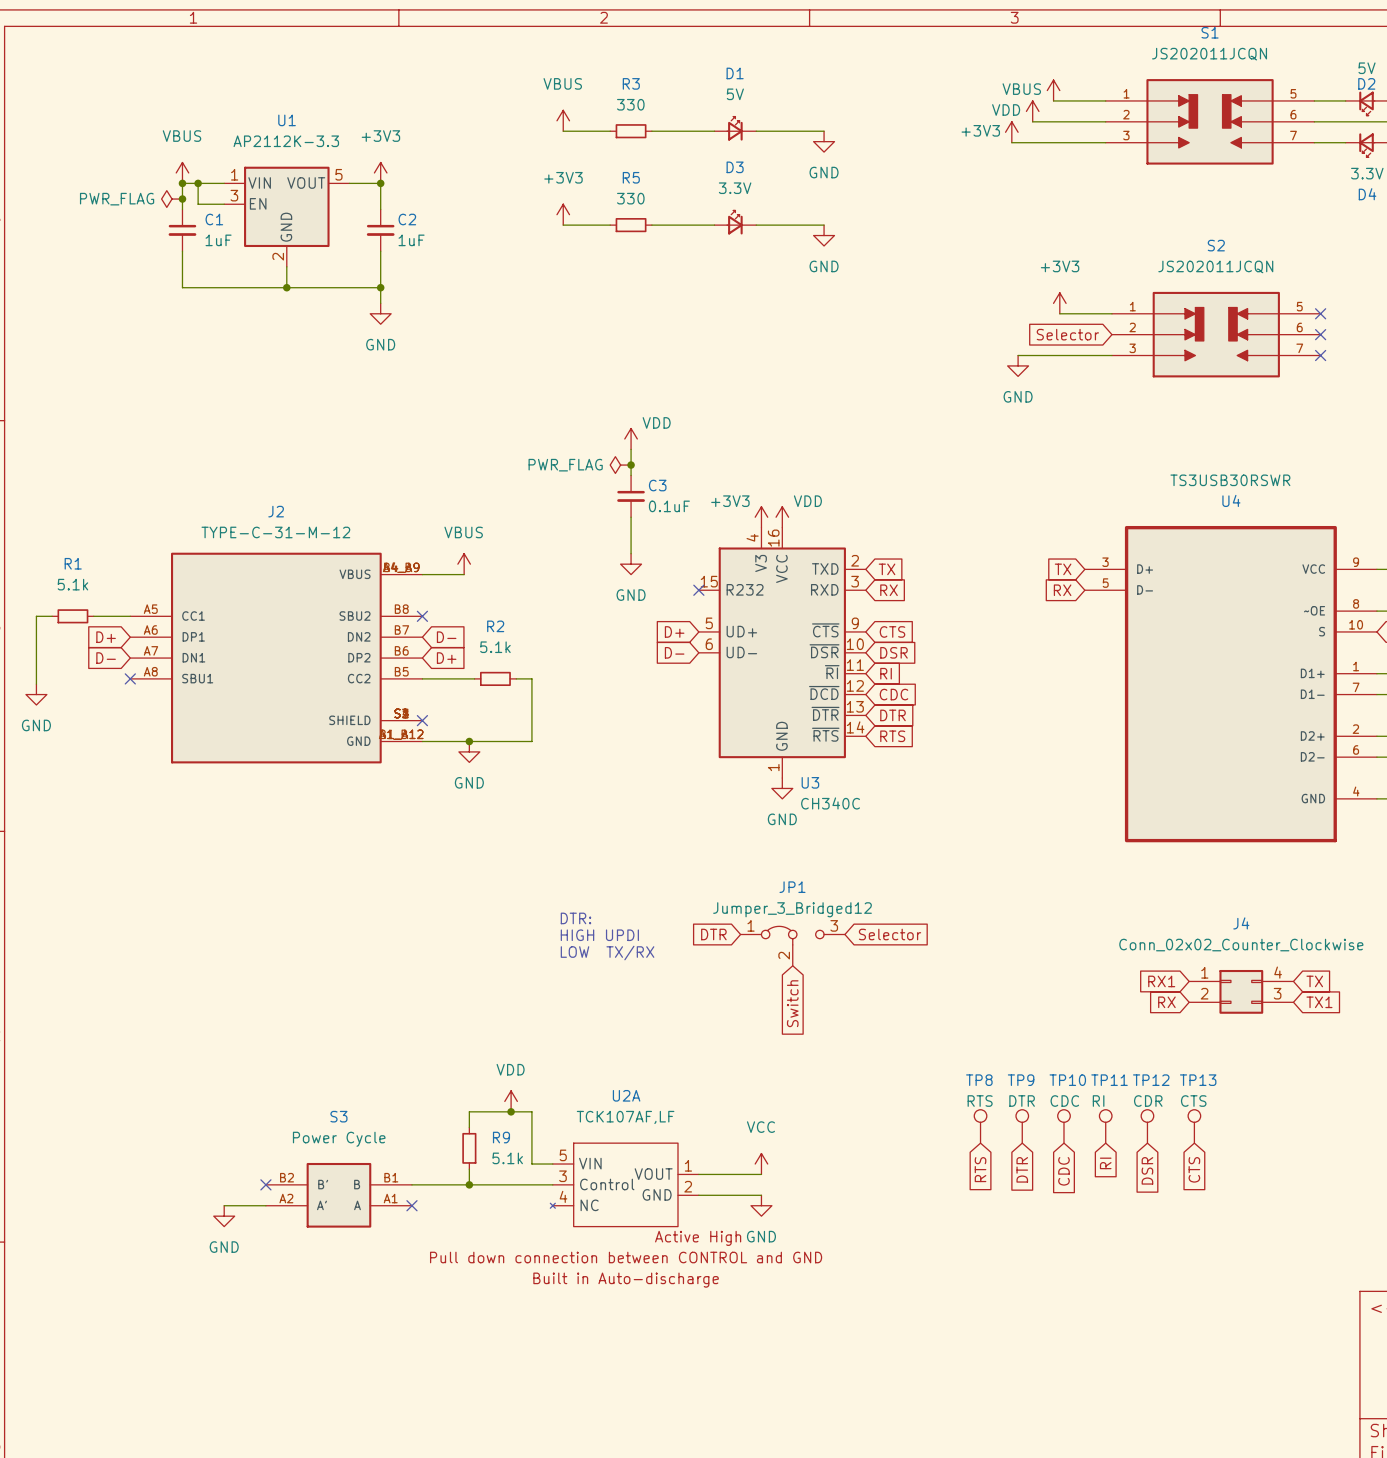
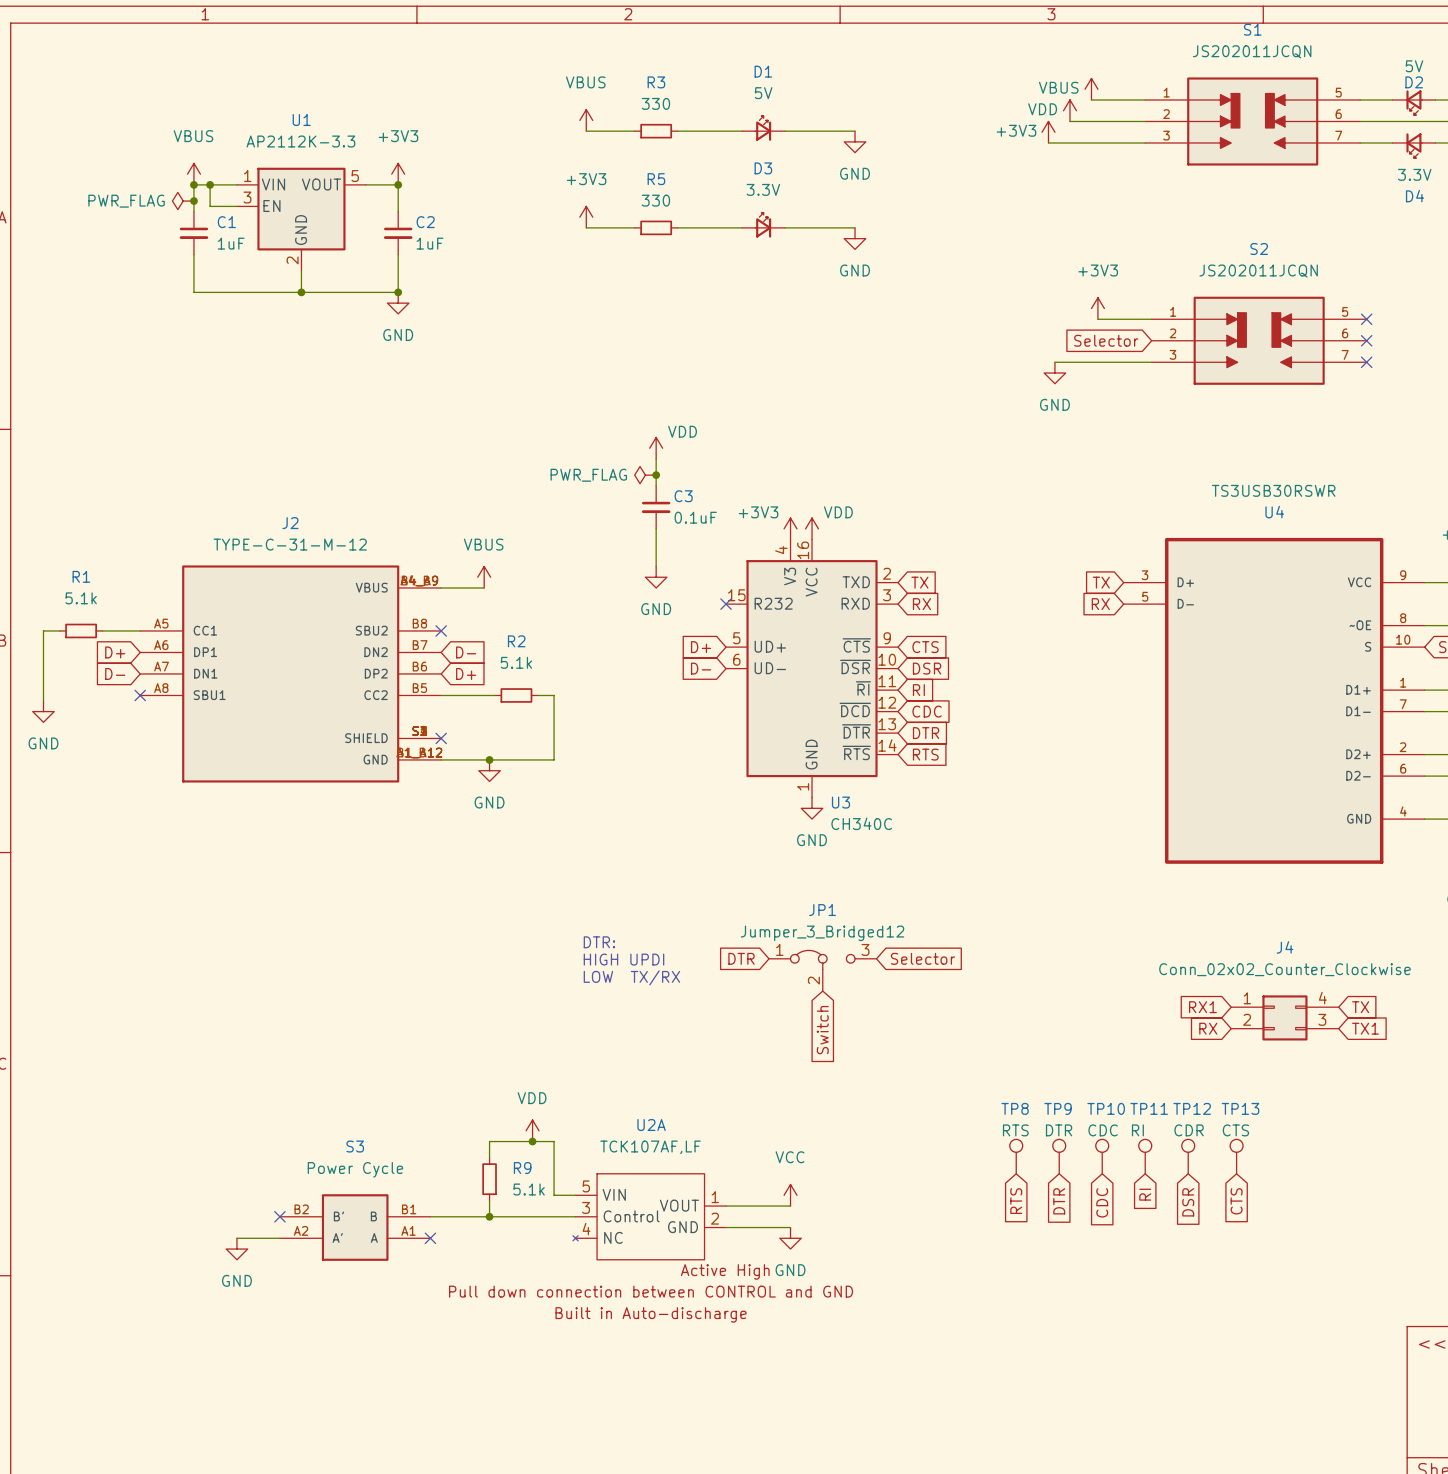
power symbol position: GND (380, 313) -> GND (398, 303)

